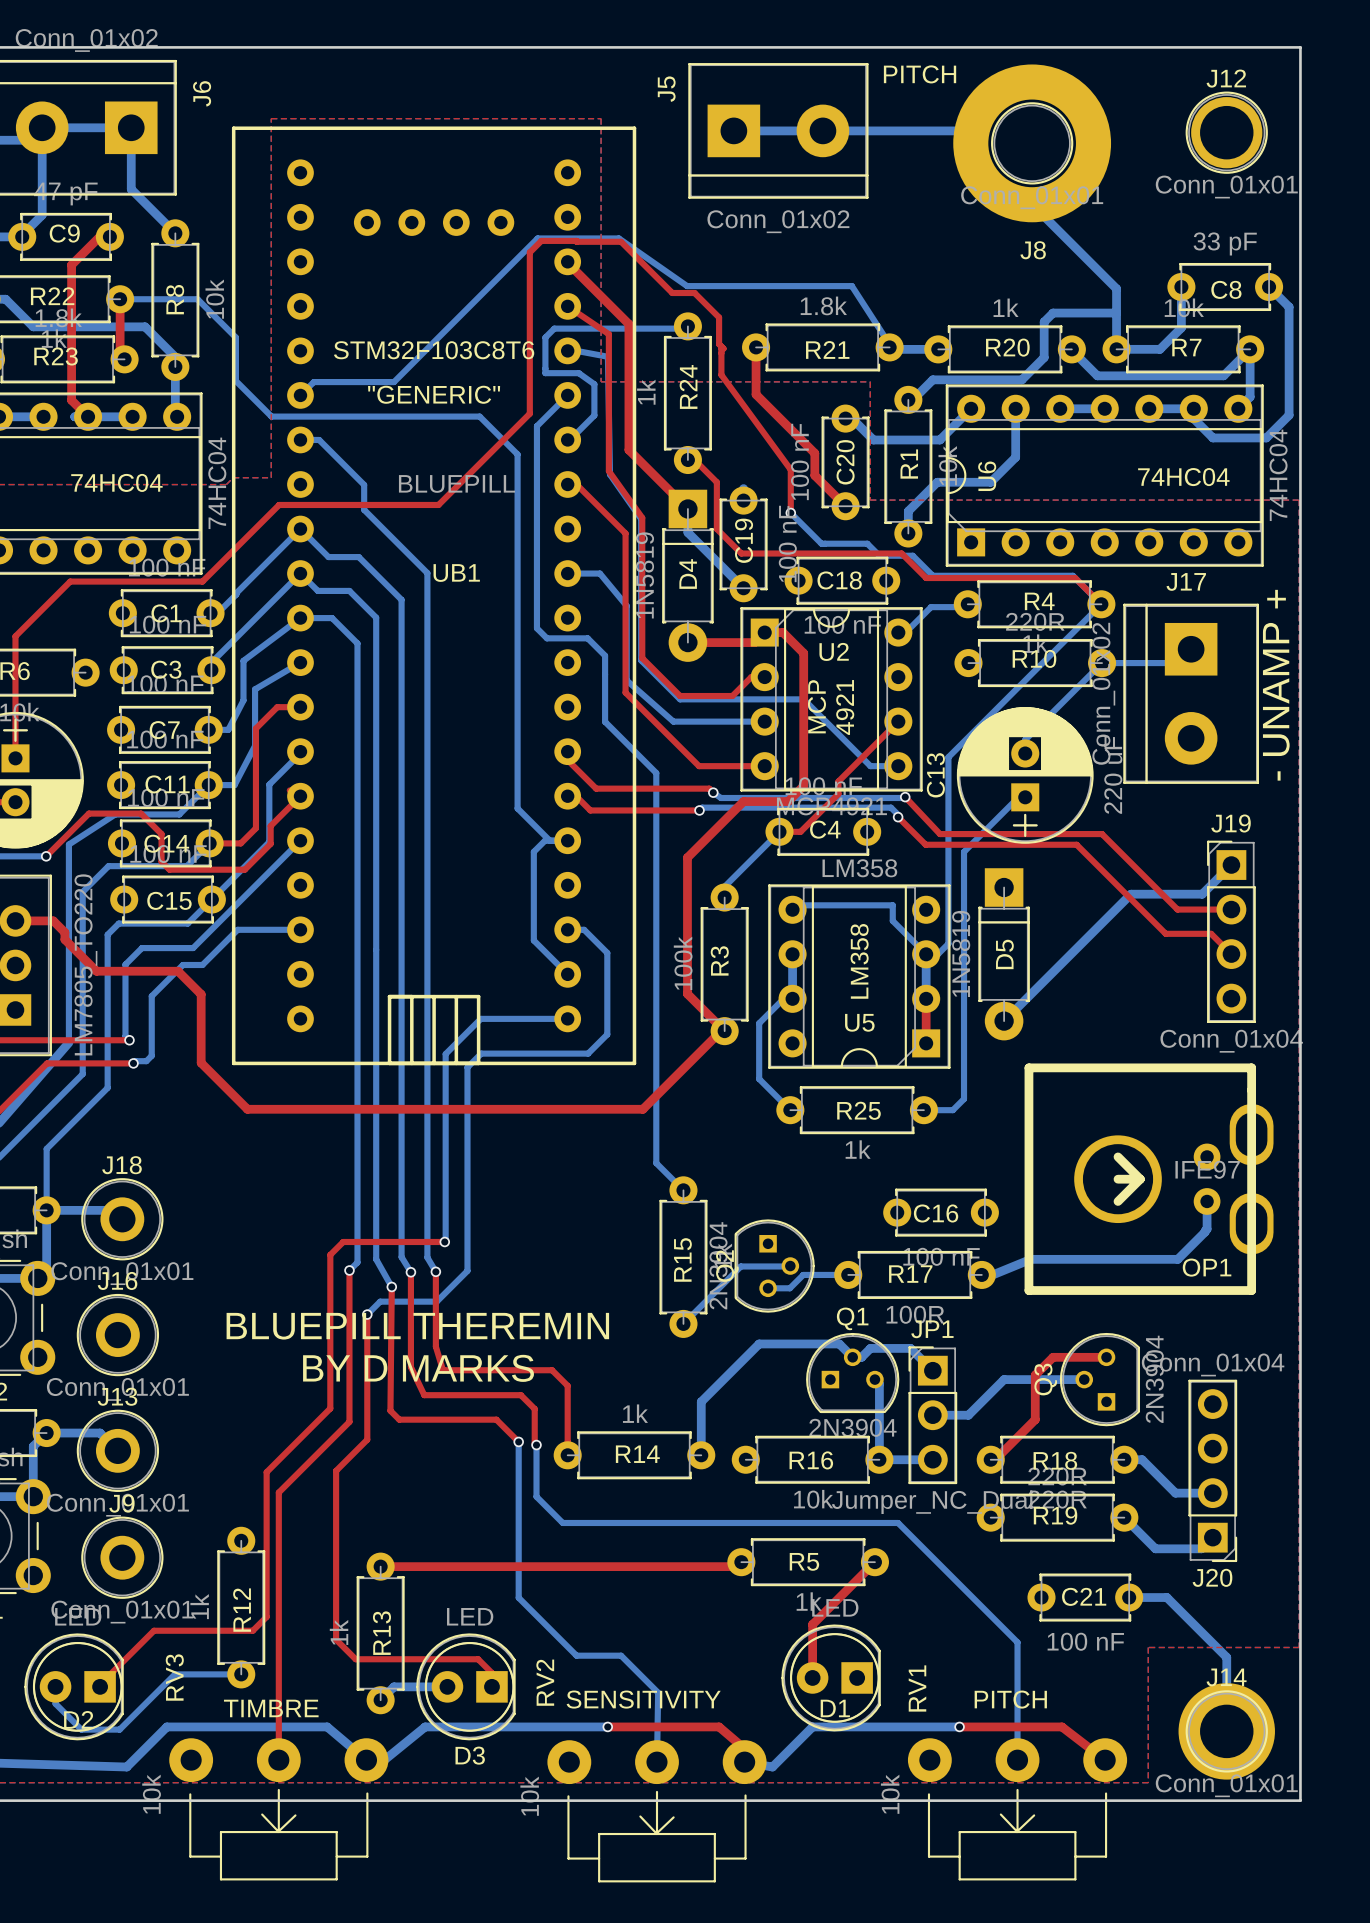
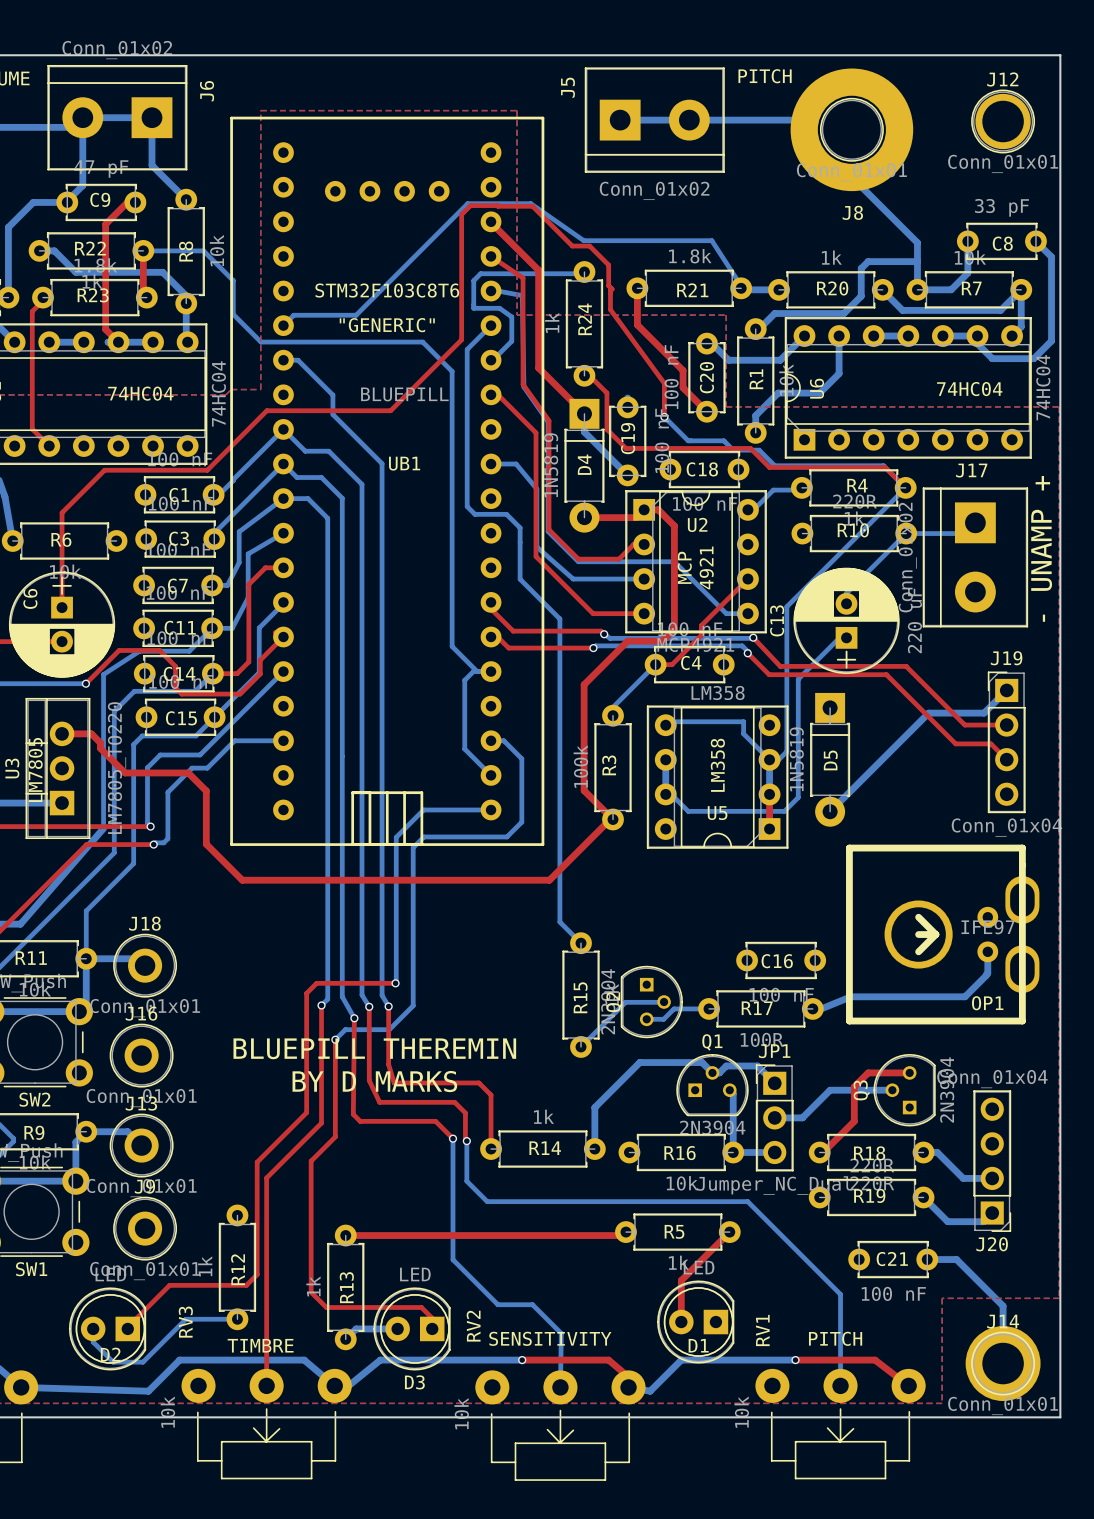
bottom track: none -> (839, 637) (798, 679) (798, 797) (784, 811) (688, 811) (671, 794)
bottom track: (1018, 797) (964, 851) (964, 1099) (952, 1110) (923, 1110) -> none
bottom track: (792, 998) (783, 998) (759, 1023) (759, 1079) (790, 1110) -> none
R25: 1k (857, 1110) -> none

